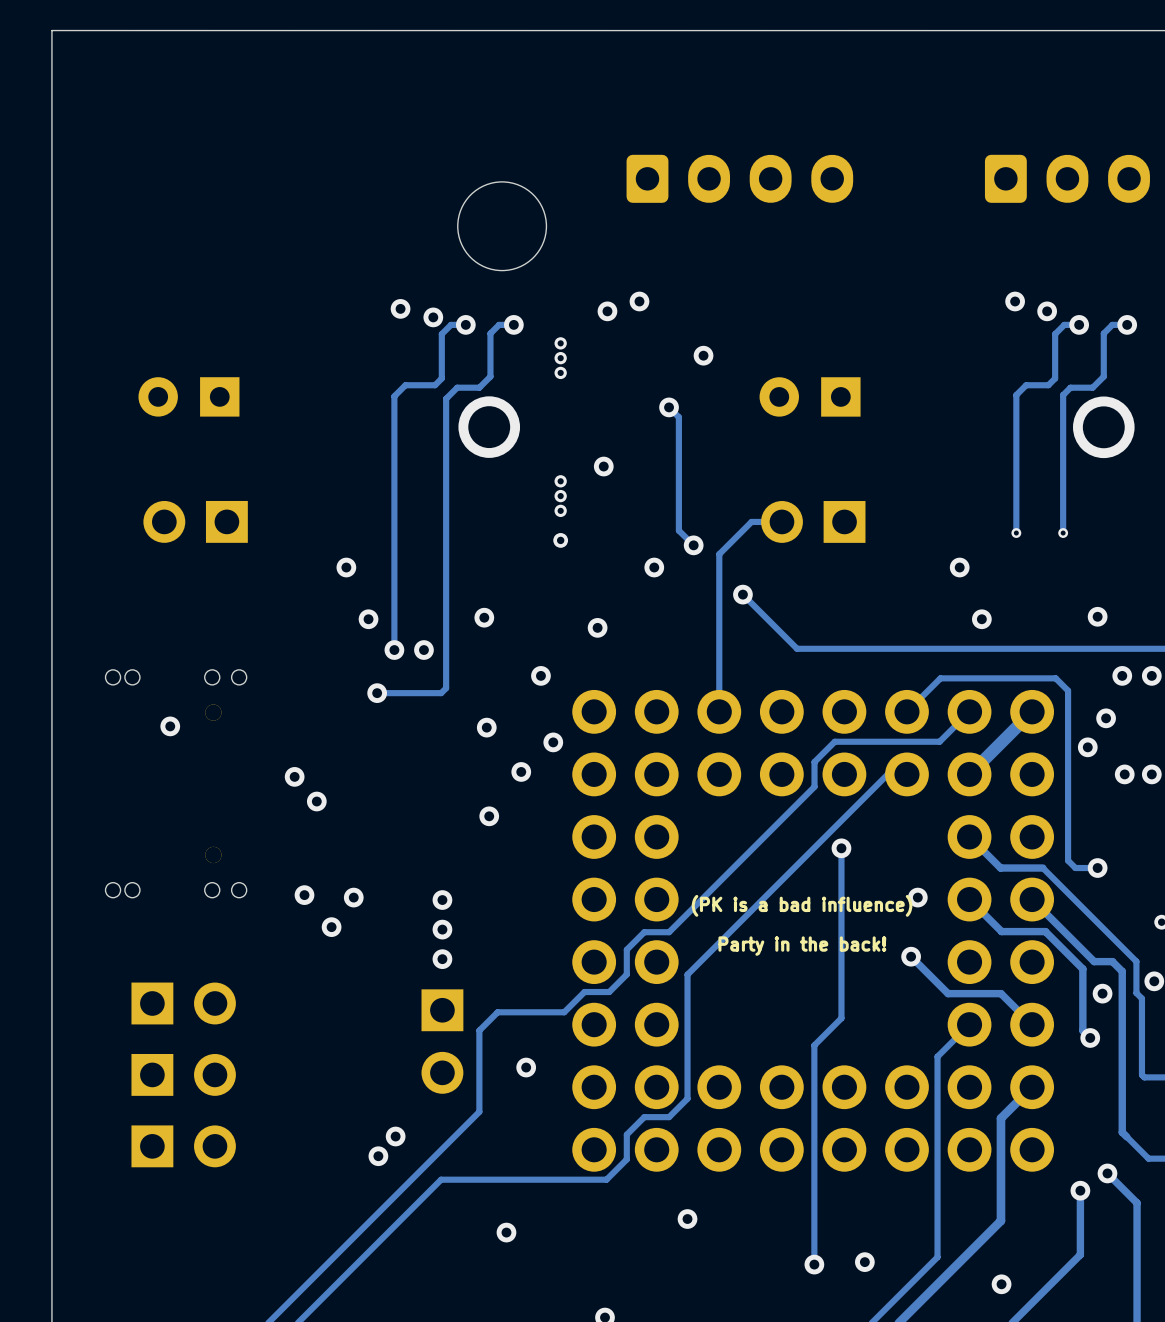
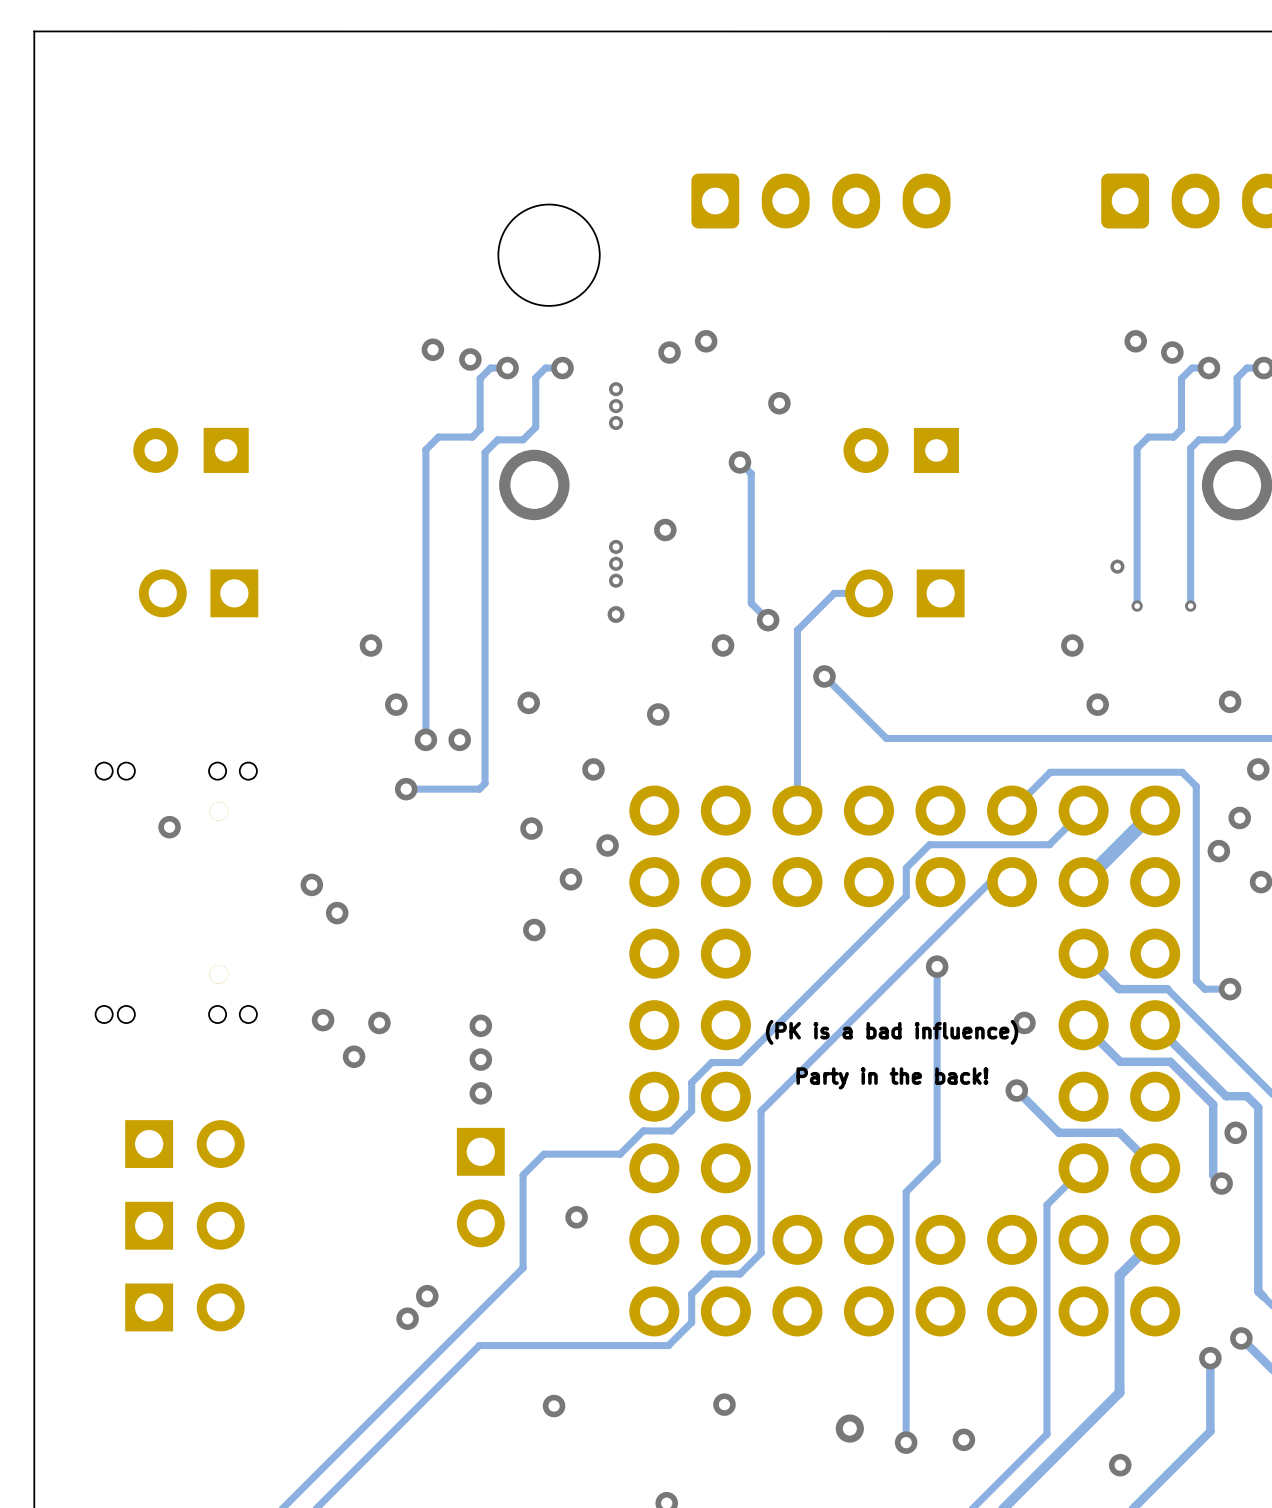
via: none -> (1117, 566)
via position: (687, 1219) -> (724, 1404)
via: none -> (849, 1428)

